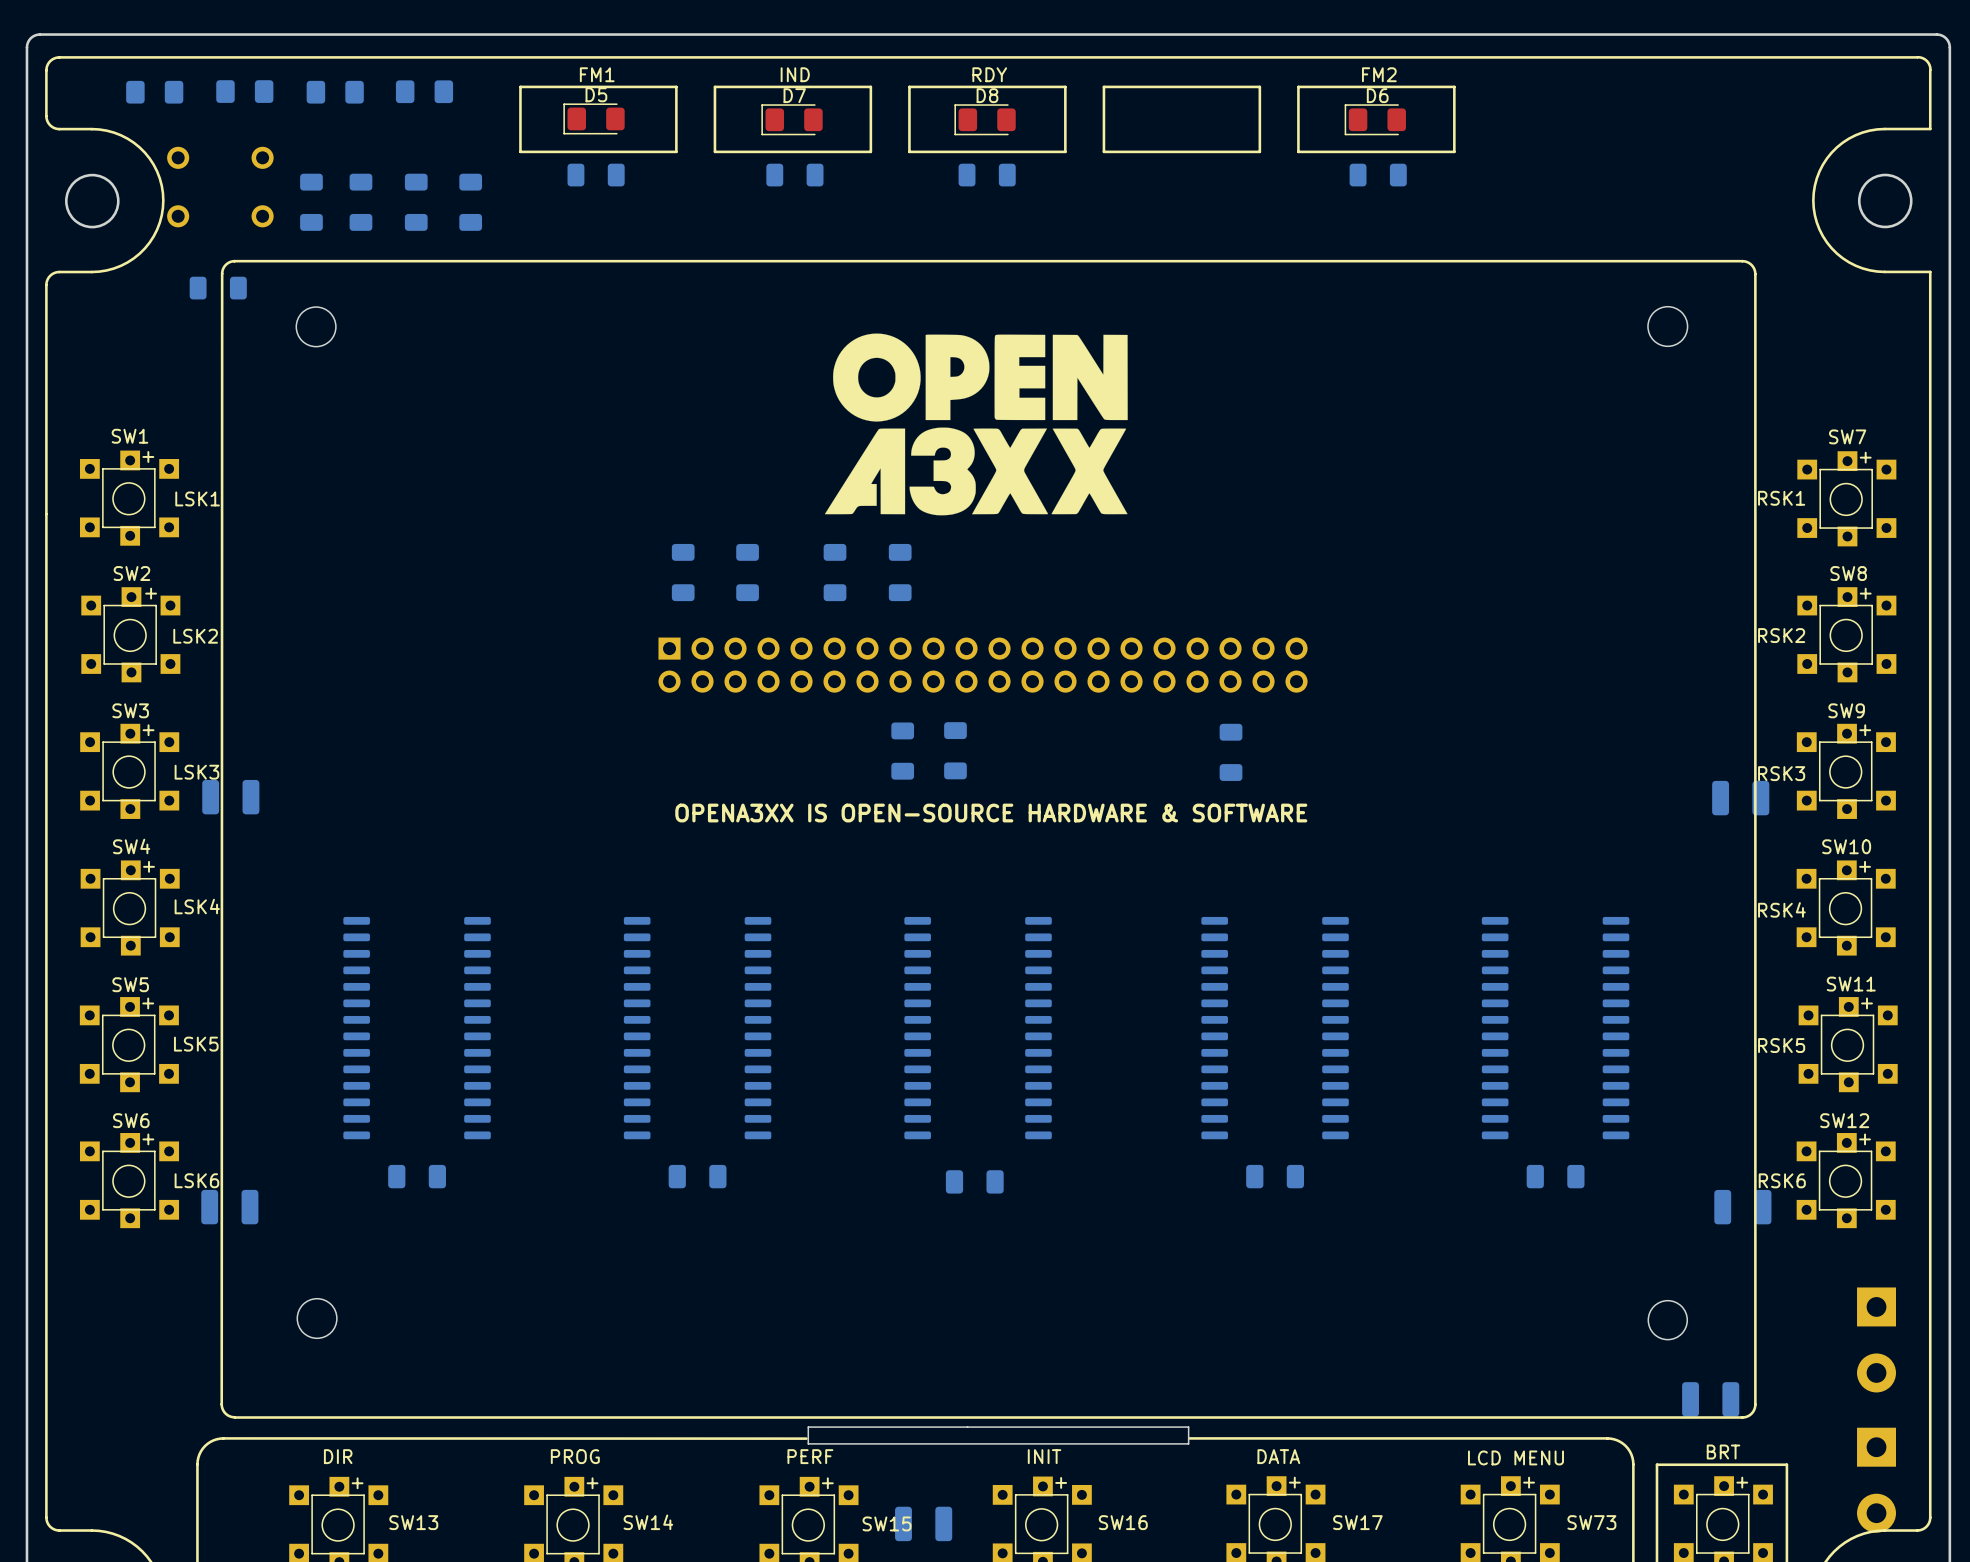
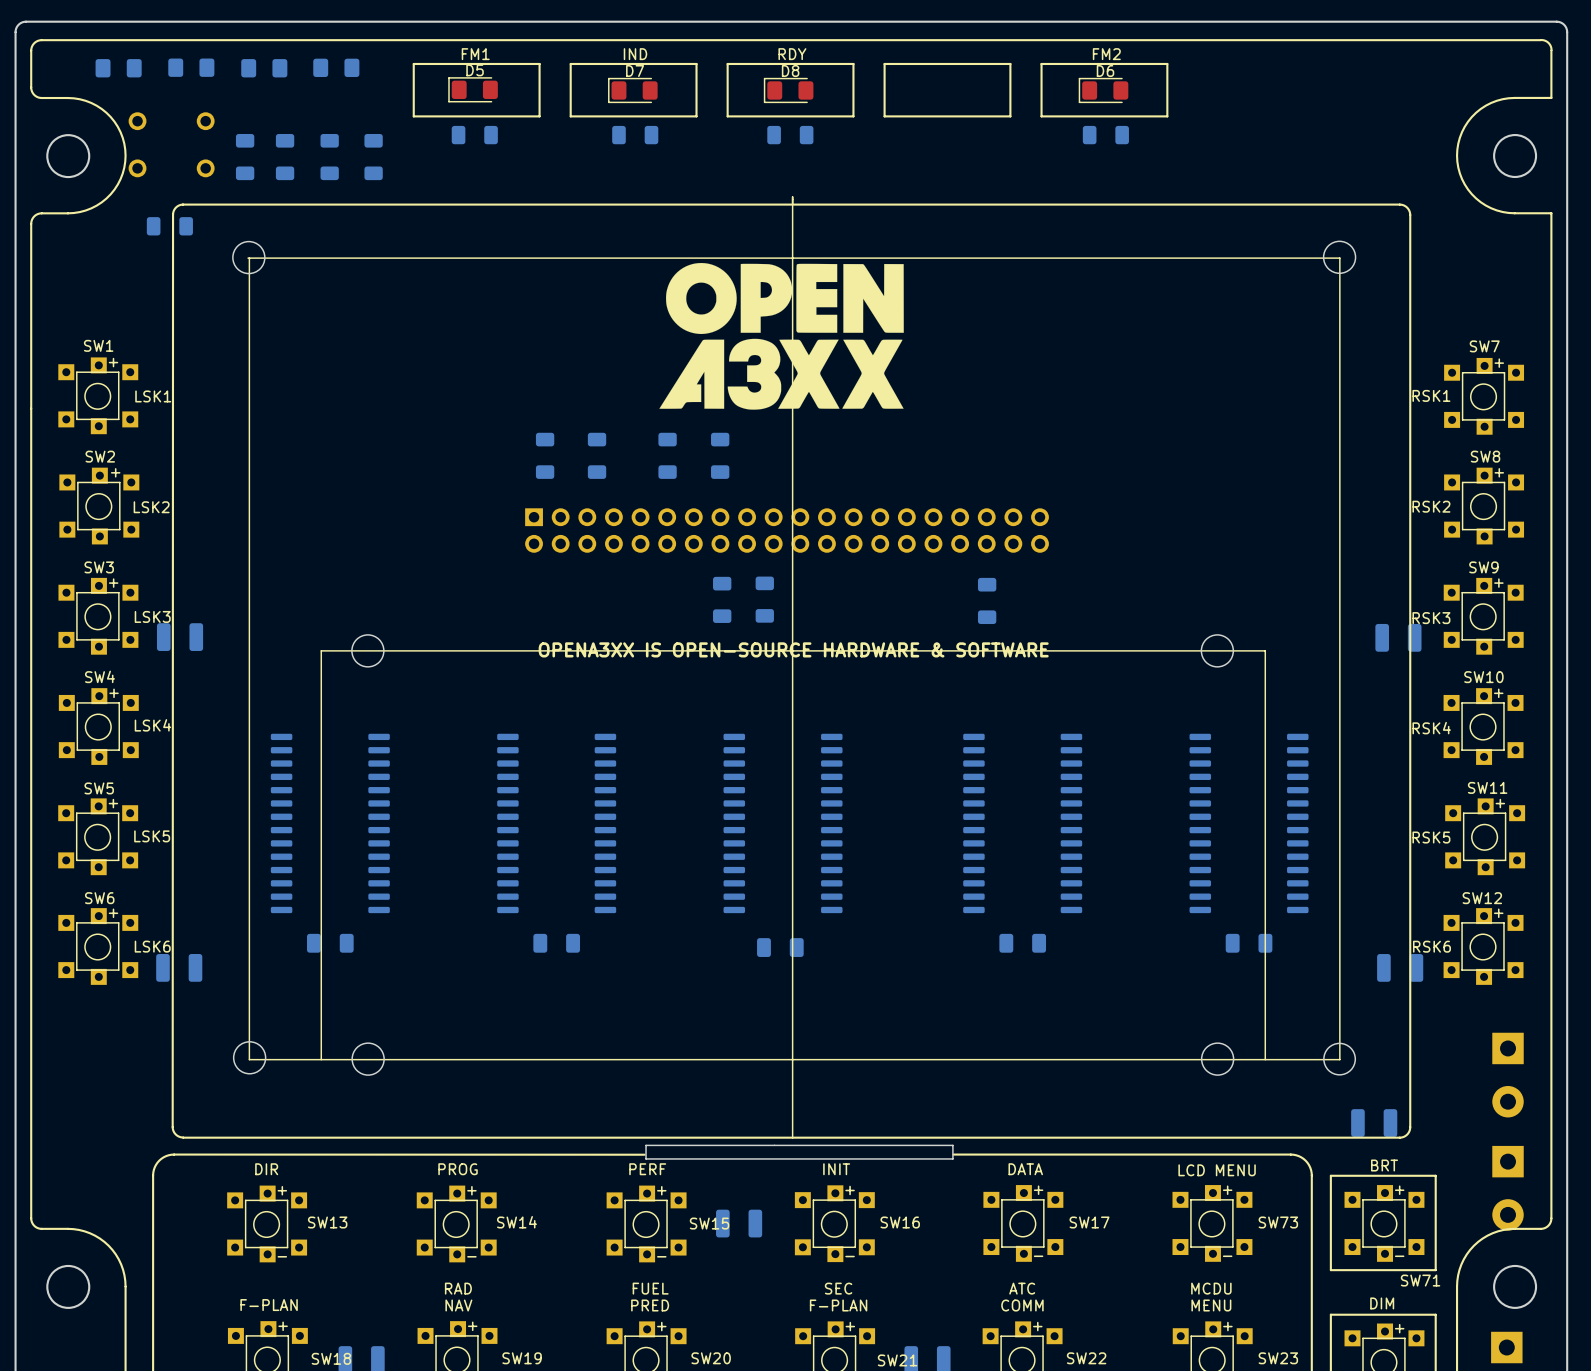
line: none -> (792, 196) (792, 1138)
line: none -> (248, 258) (1339, 258) (1339, 1059) (249, 1059) (249, 258)
round board edge: none -> [351, 634, 385, 668]
round board edge: none -> [1201, 634, 1234, 668]
round board edge: none -> [351, 1042, 385, 1076]
round board edge: none -> [1201, 1042, 1234, 1076]
line: none -> (321, 1059) (321, 650) (1265, 650) (1265, 1059)

